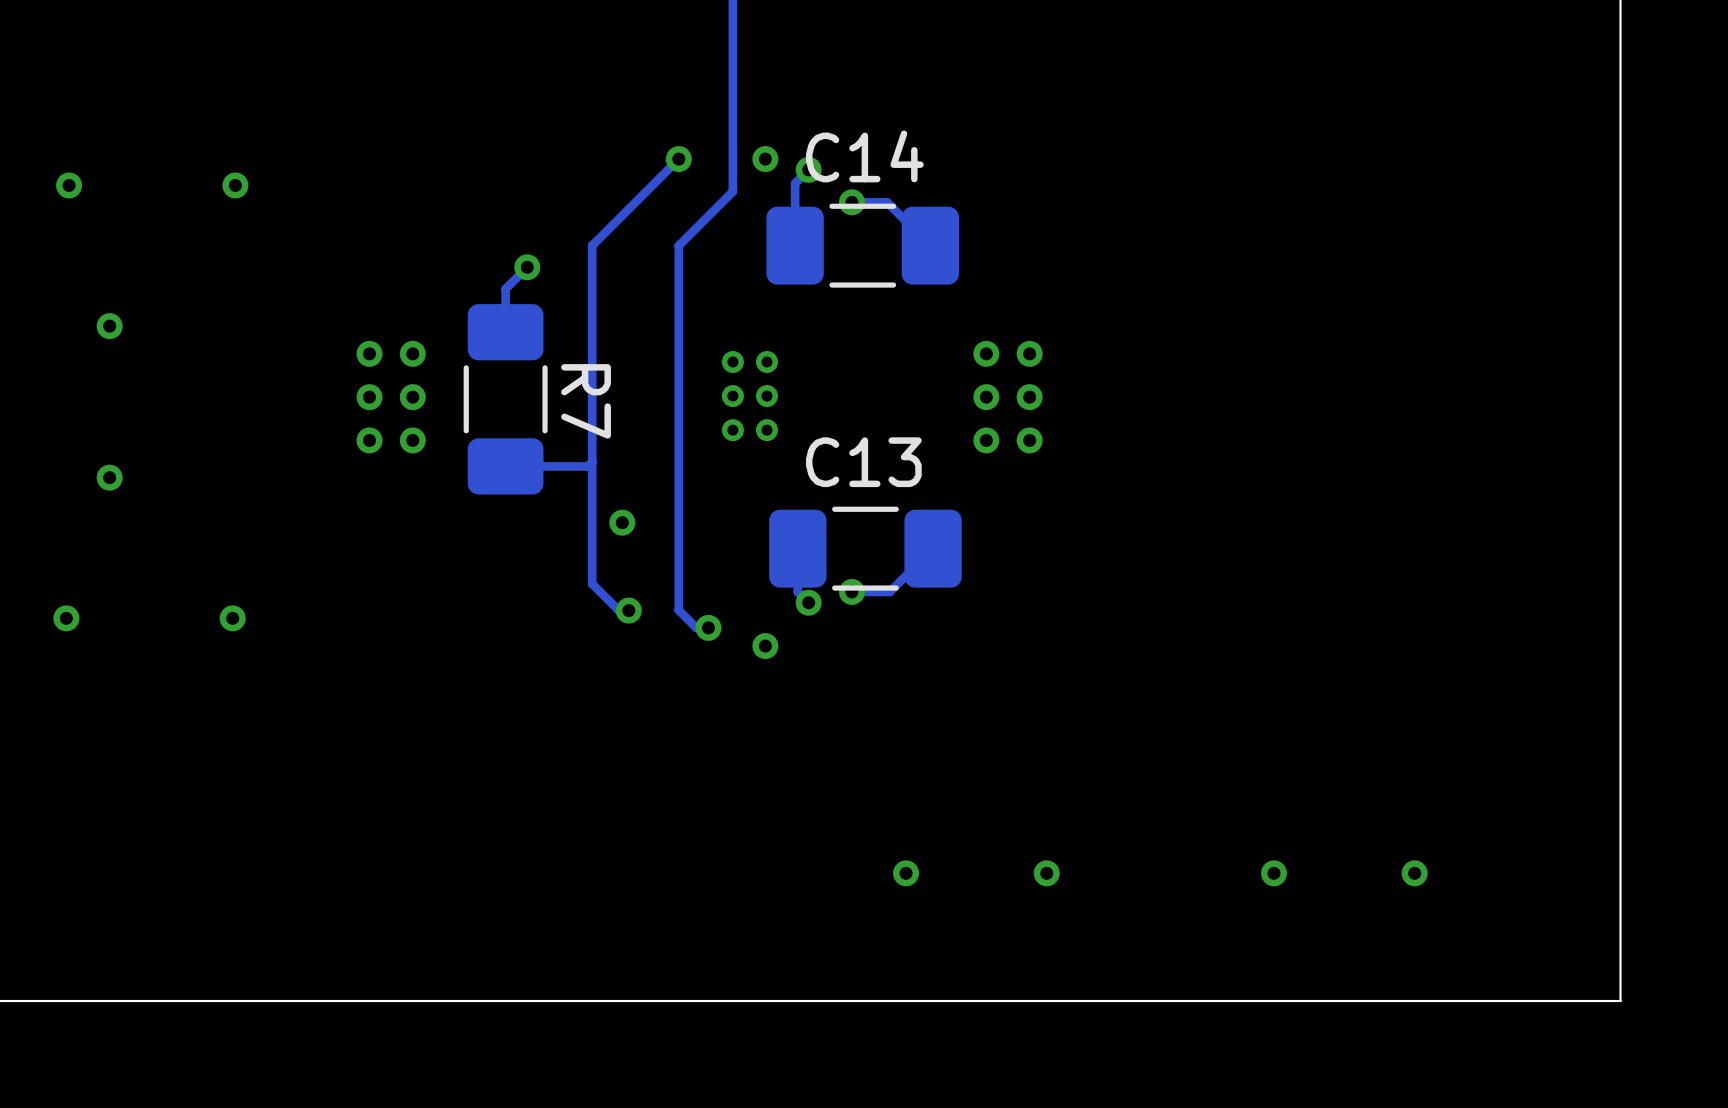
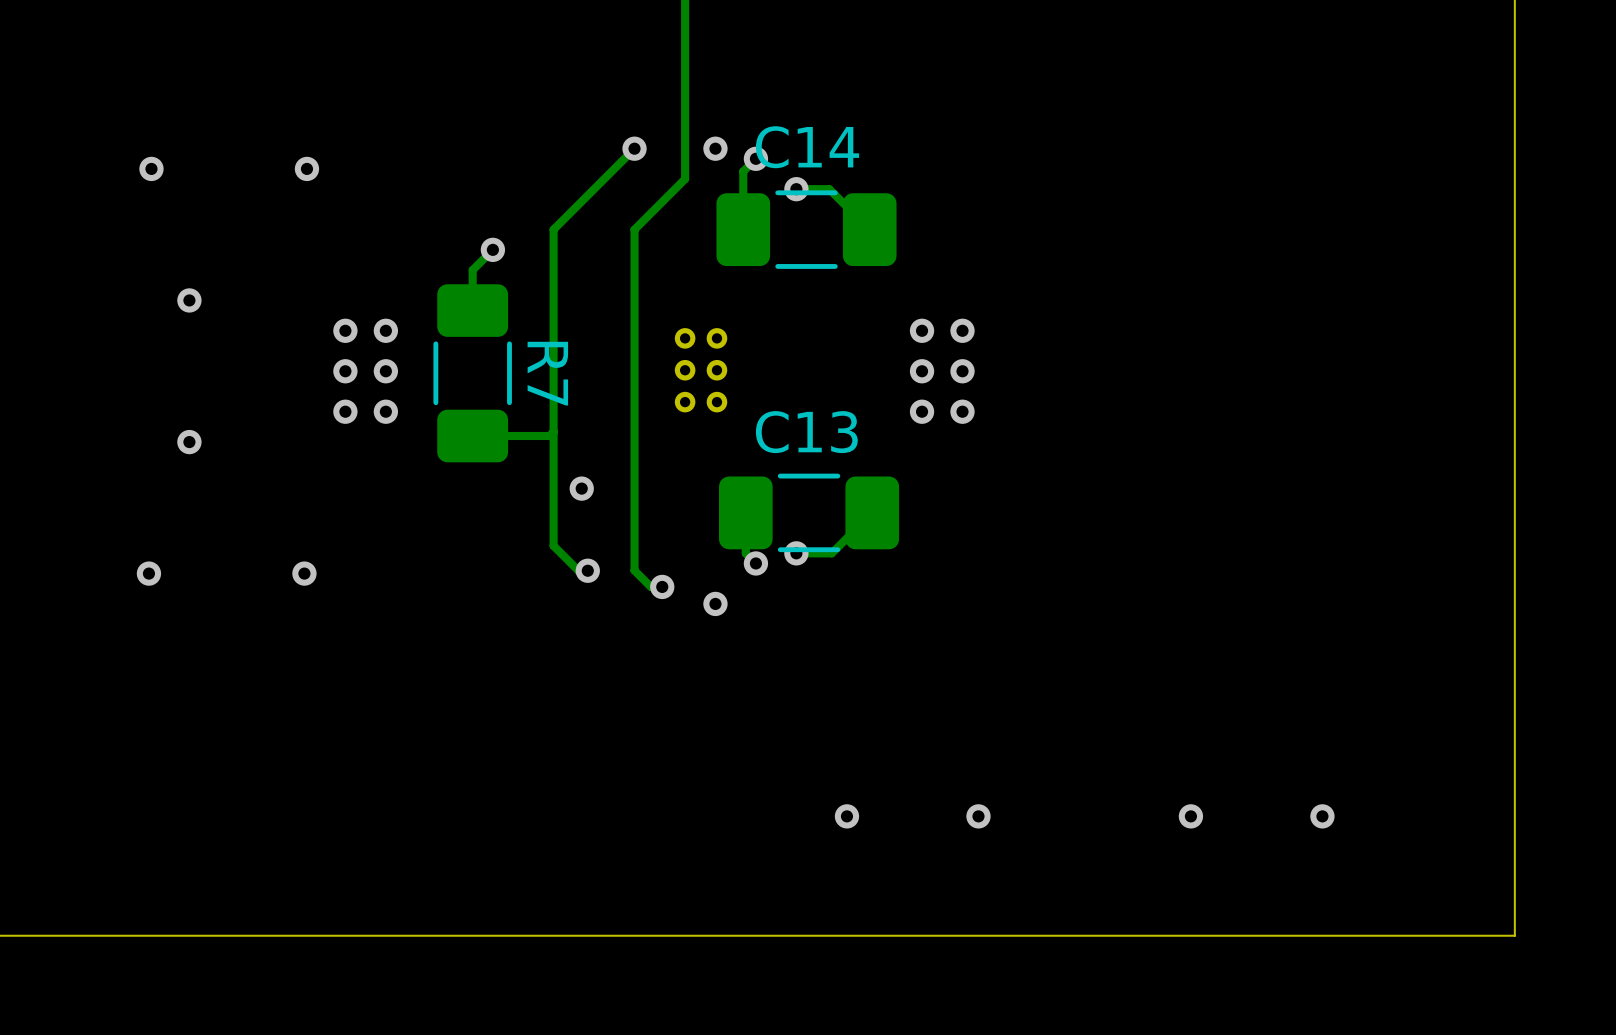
via: none -> (151, 168)
via: none -> (306, 168)
via: (69, 185) -> none
via: (235, 185) -> none
via: none -> (189, 300)
via: (109, 326) -> none
via: none -> (189, 442)
via: (109, 477) -> none
via: none -> (148, 573)
via: none -> (304, 573)
via: (66, 618) -> none
via: (232, 618) -> none

